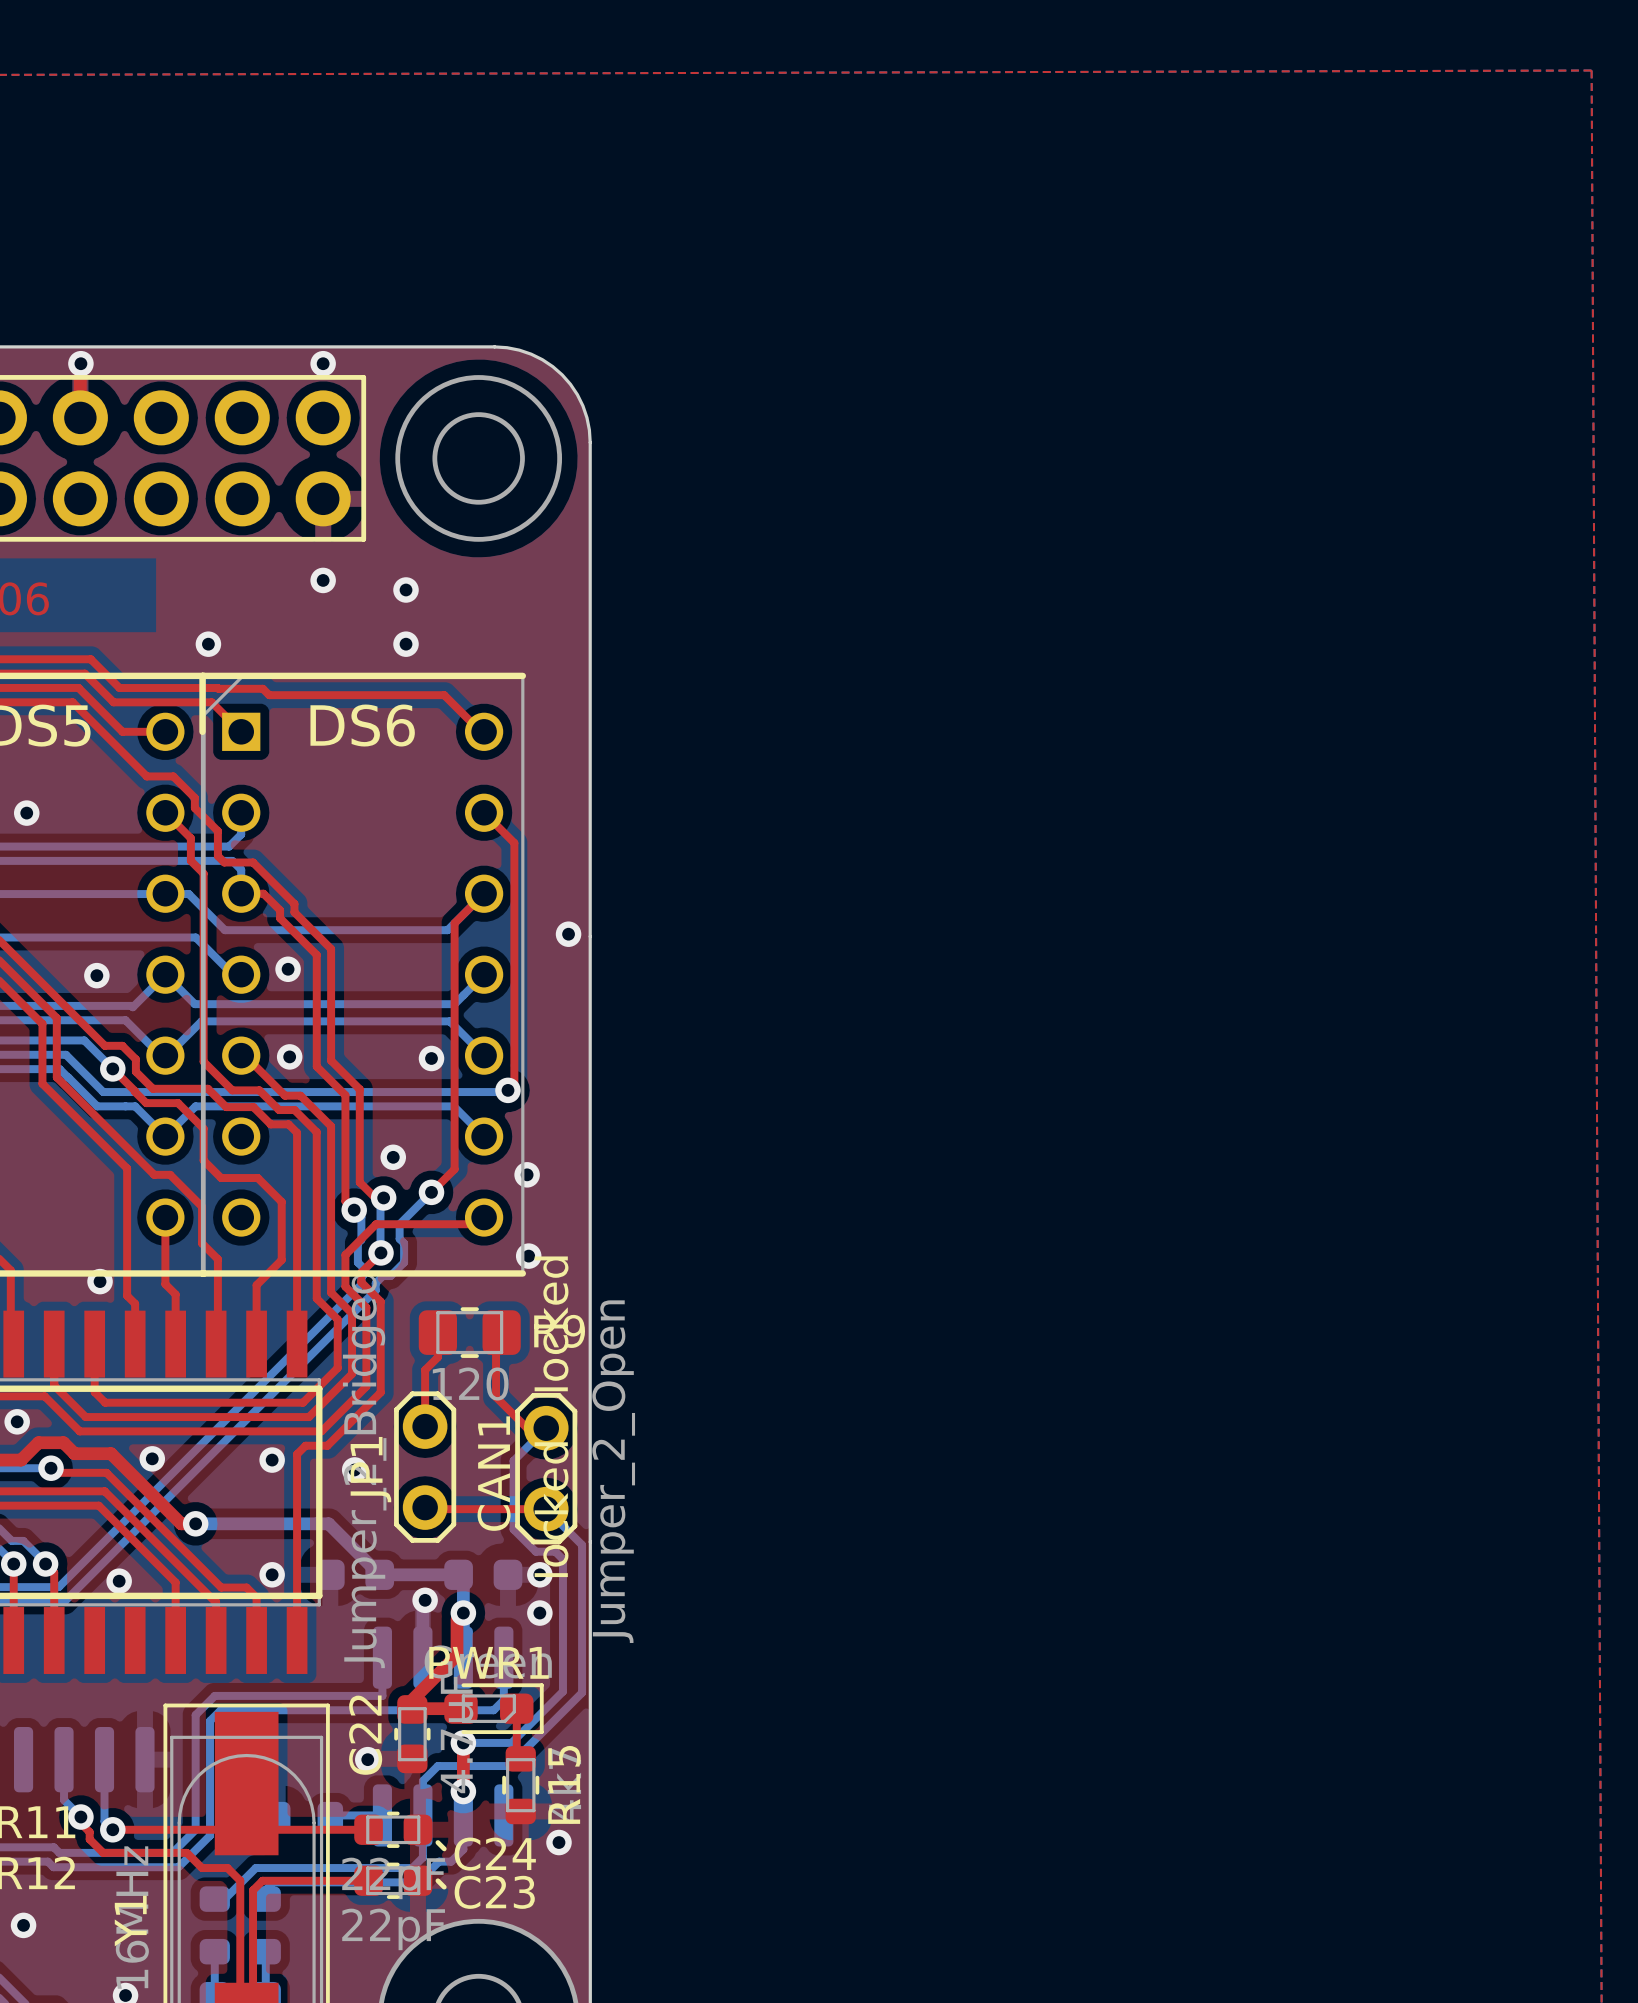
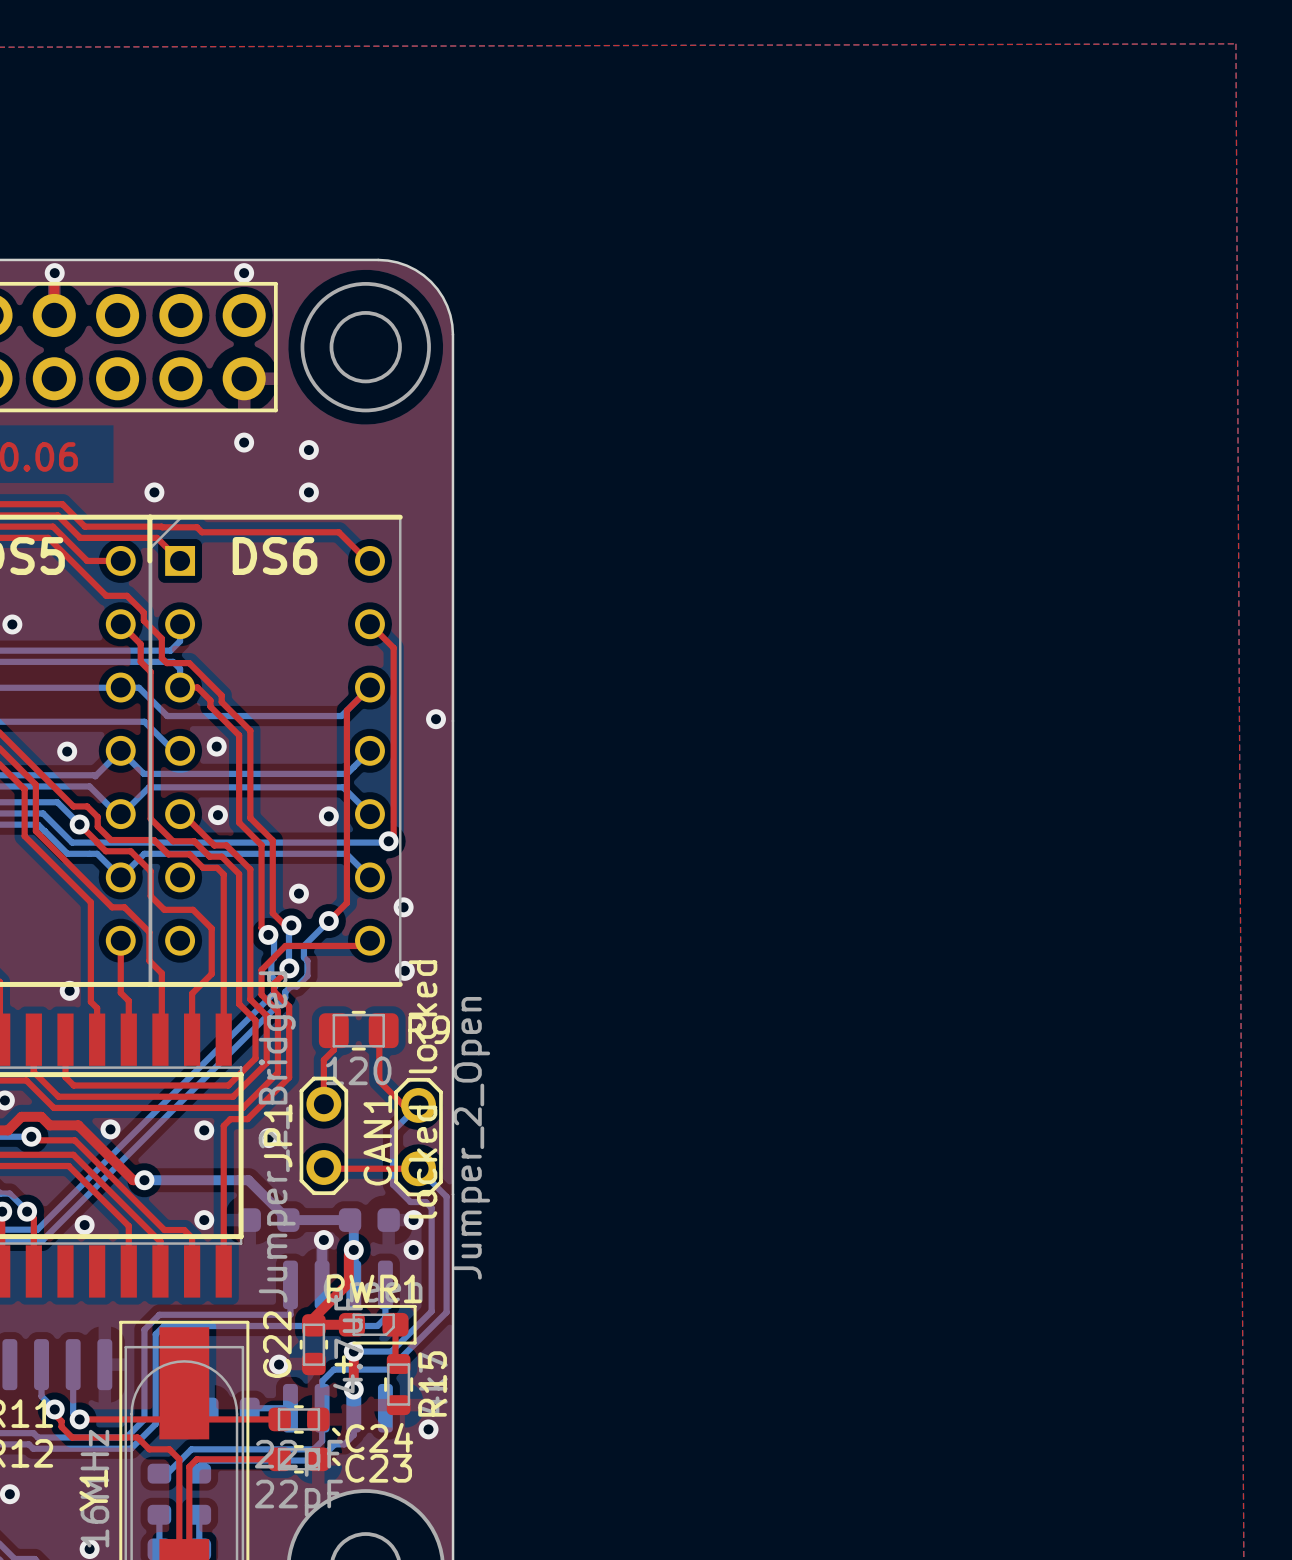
line: none -> (343, 1357) (343, 1372)
line: none -> (336, 1364) (351, 1364)

